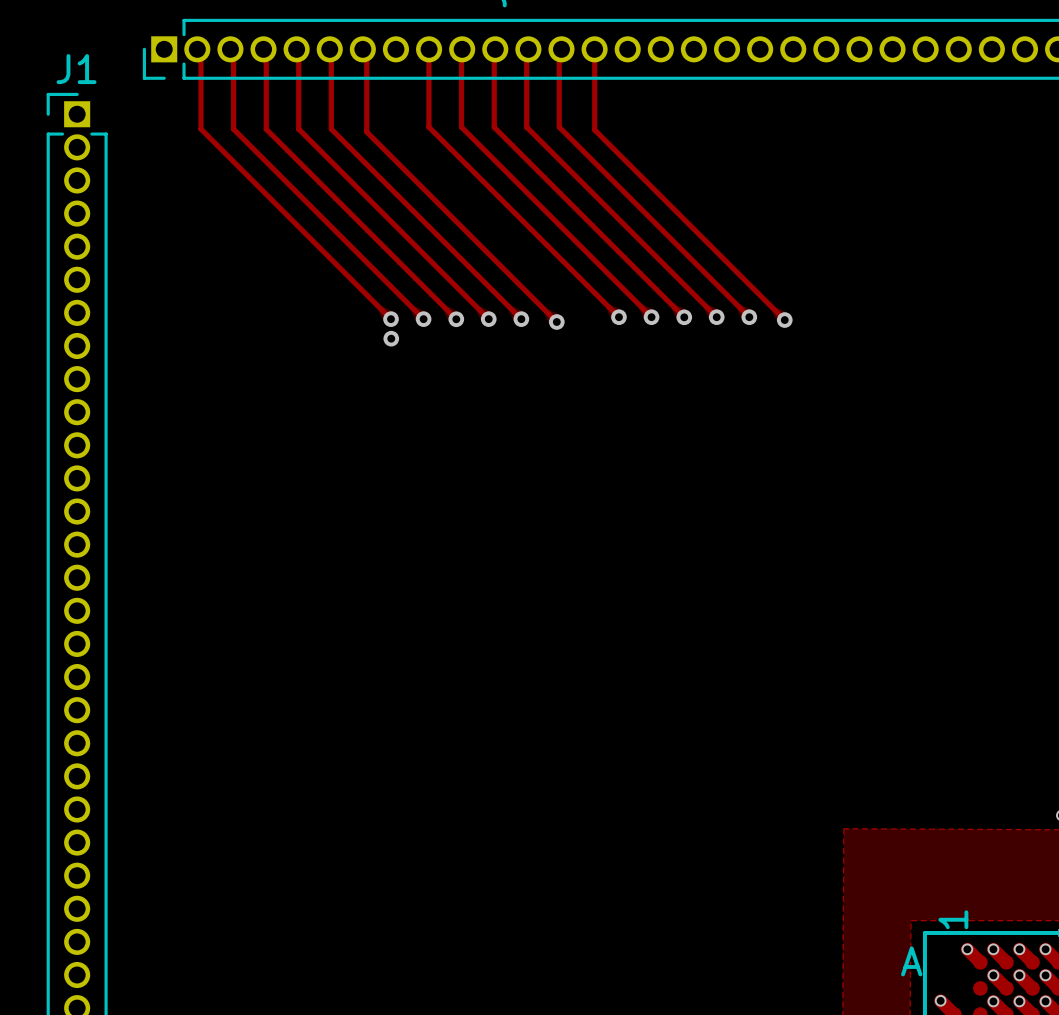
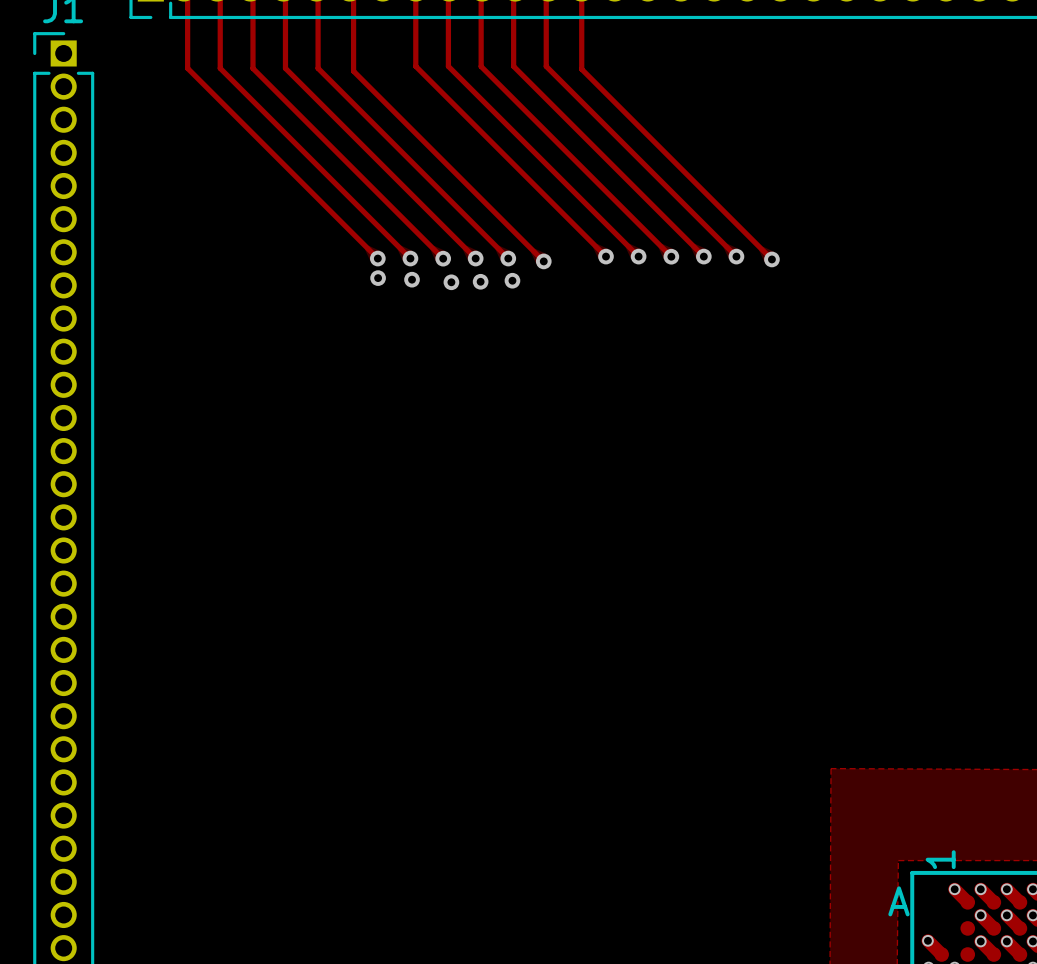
via: none -> (412, 279)
via: none -> (512, 280)
via: none -> (451, 282)
via: none -> (480, 281)

